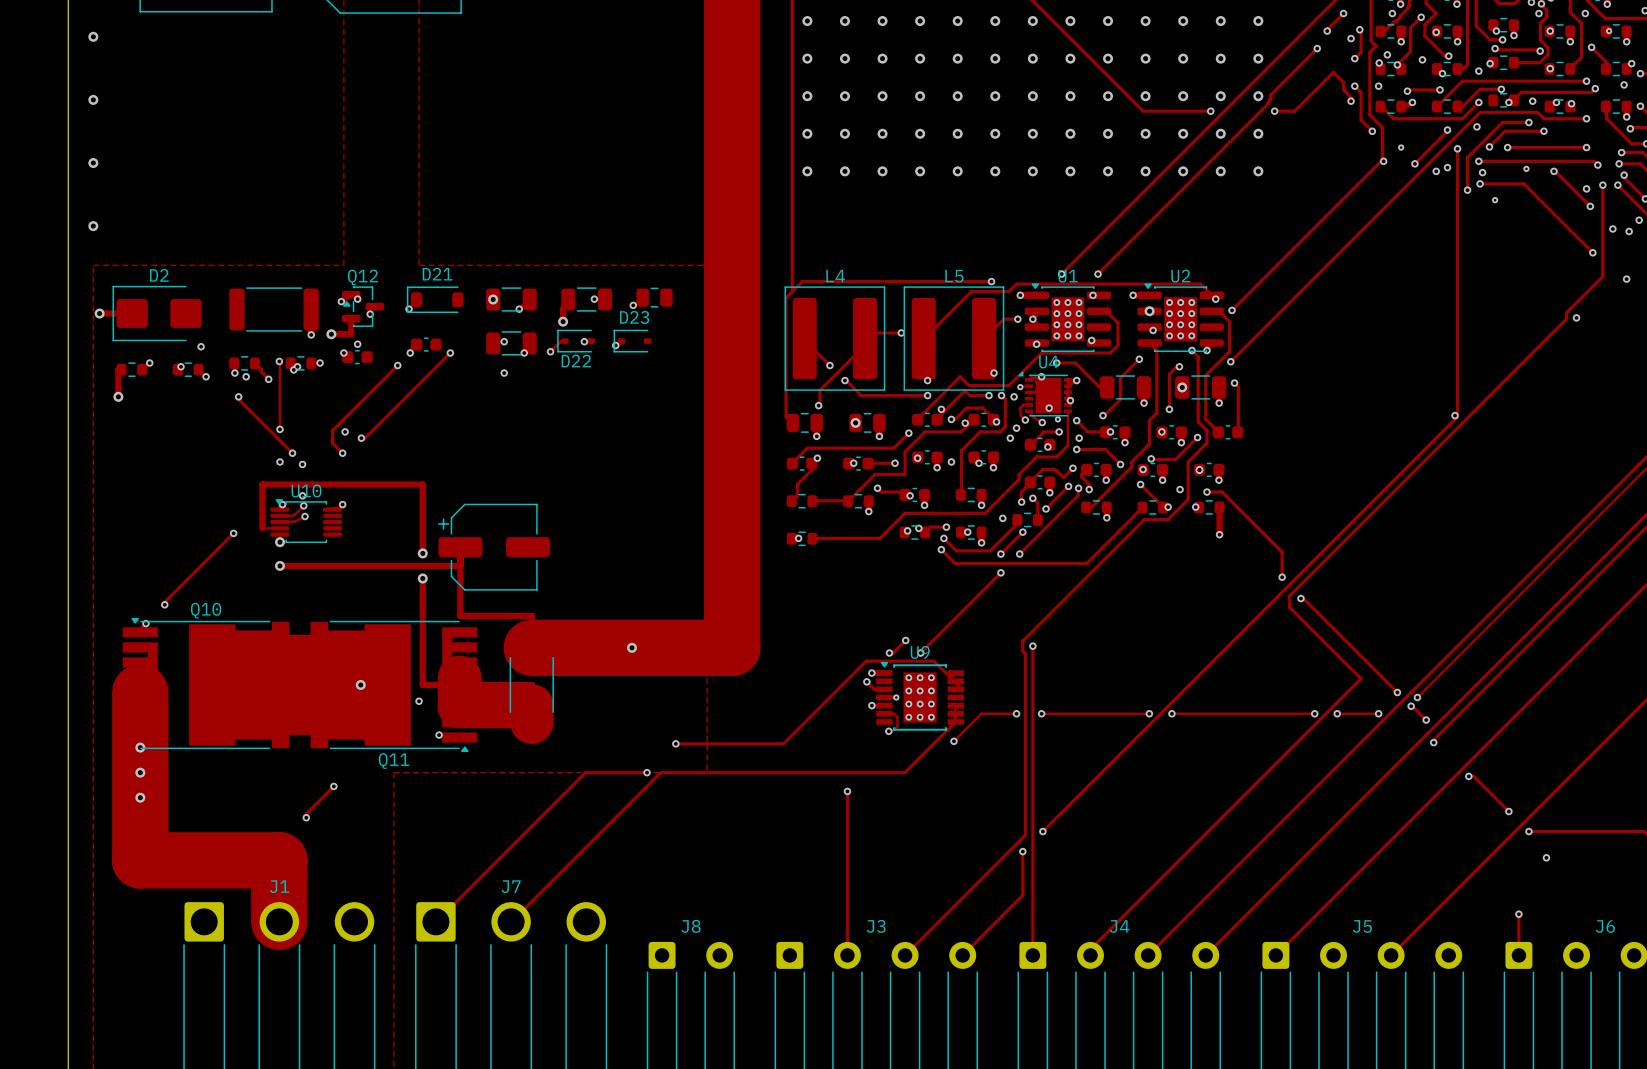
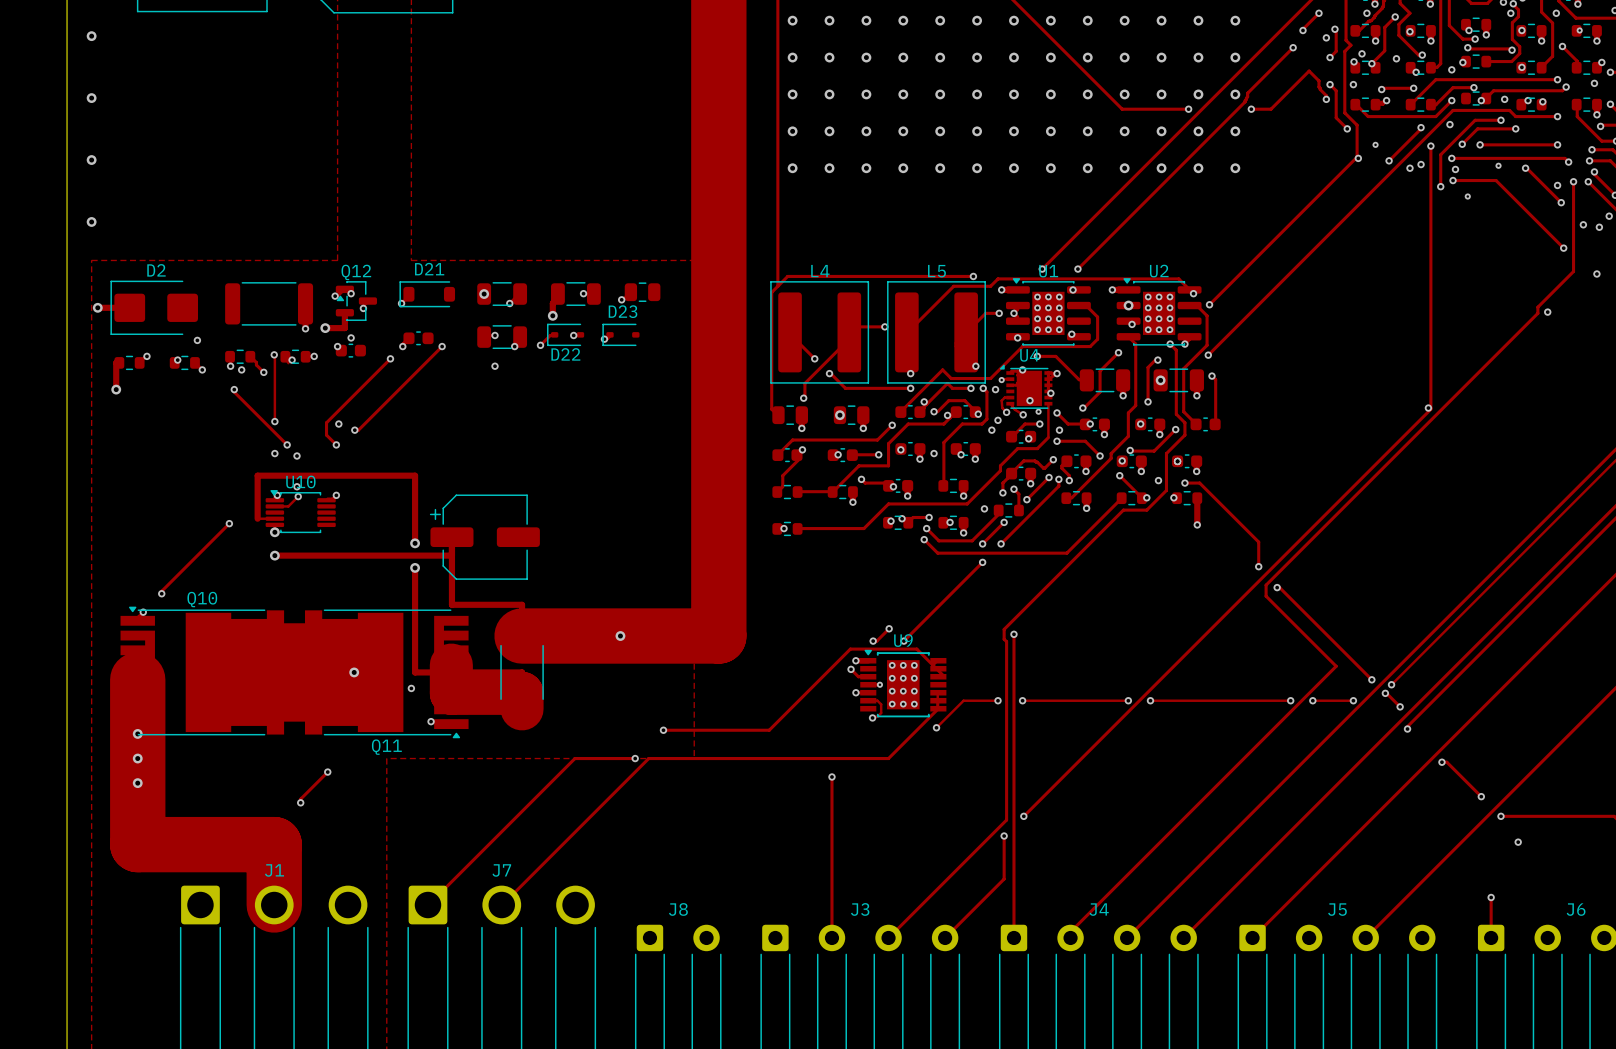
via: (293, 369) -> none
track: (305, 516) (295, 521) (283, 522) -> none
via: (305, 516) -> none

